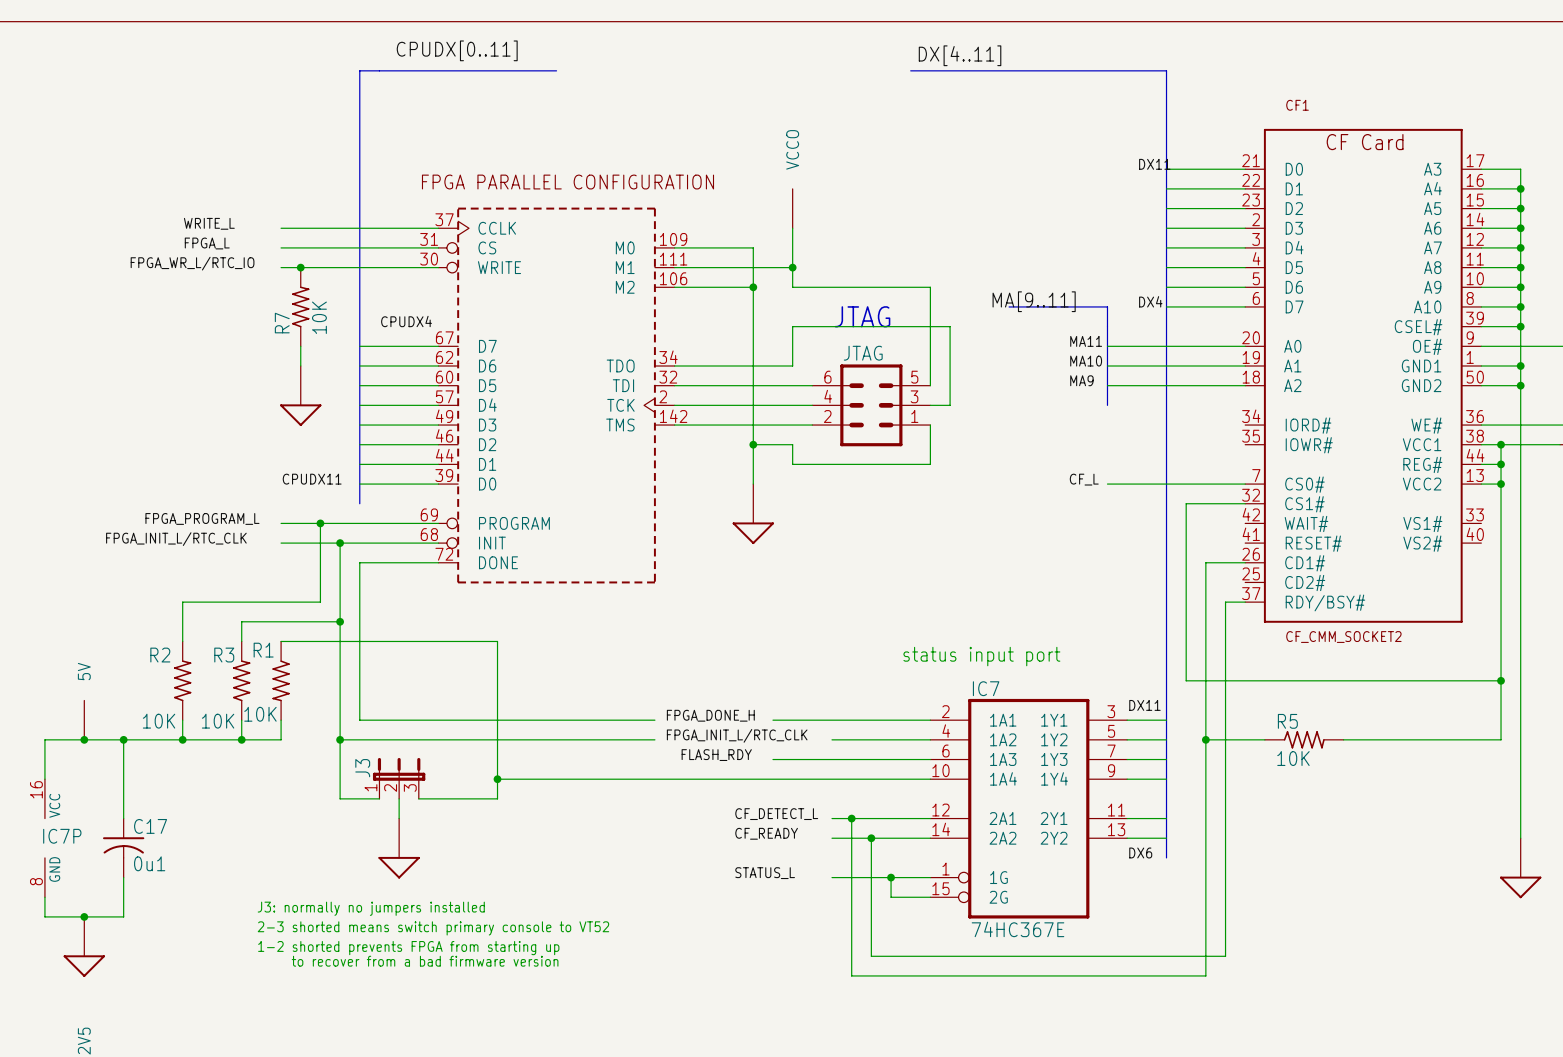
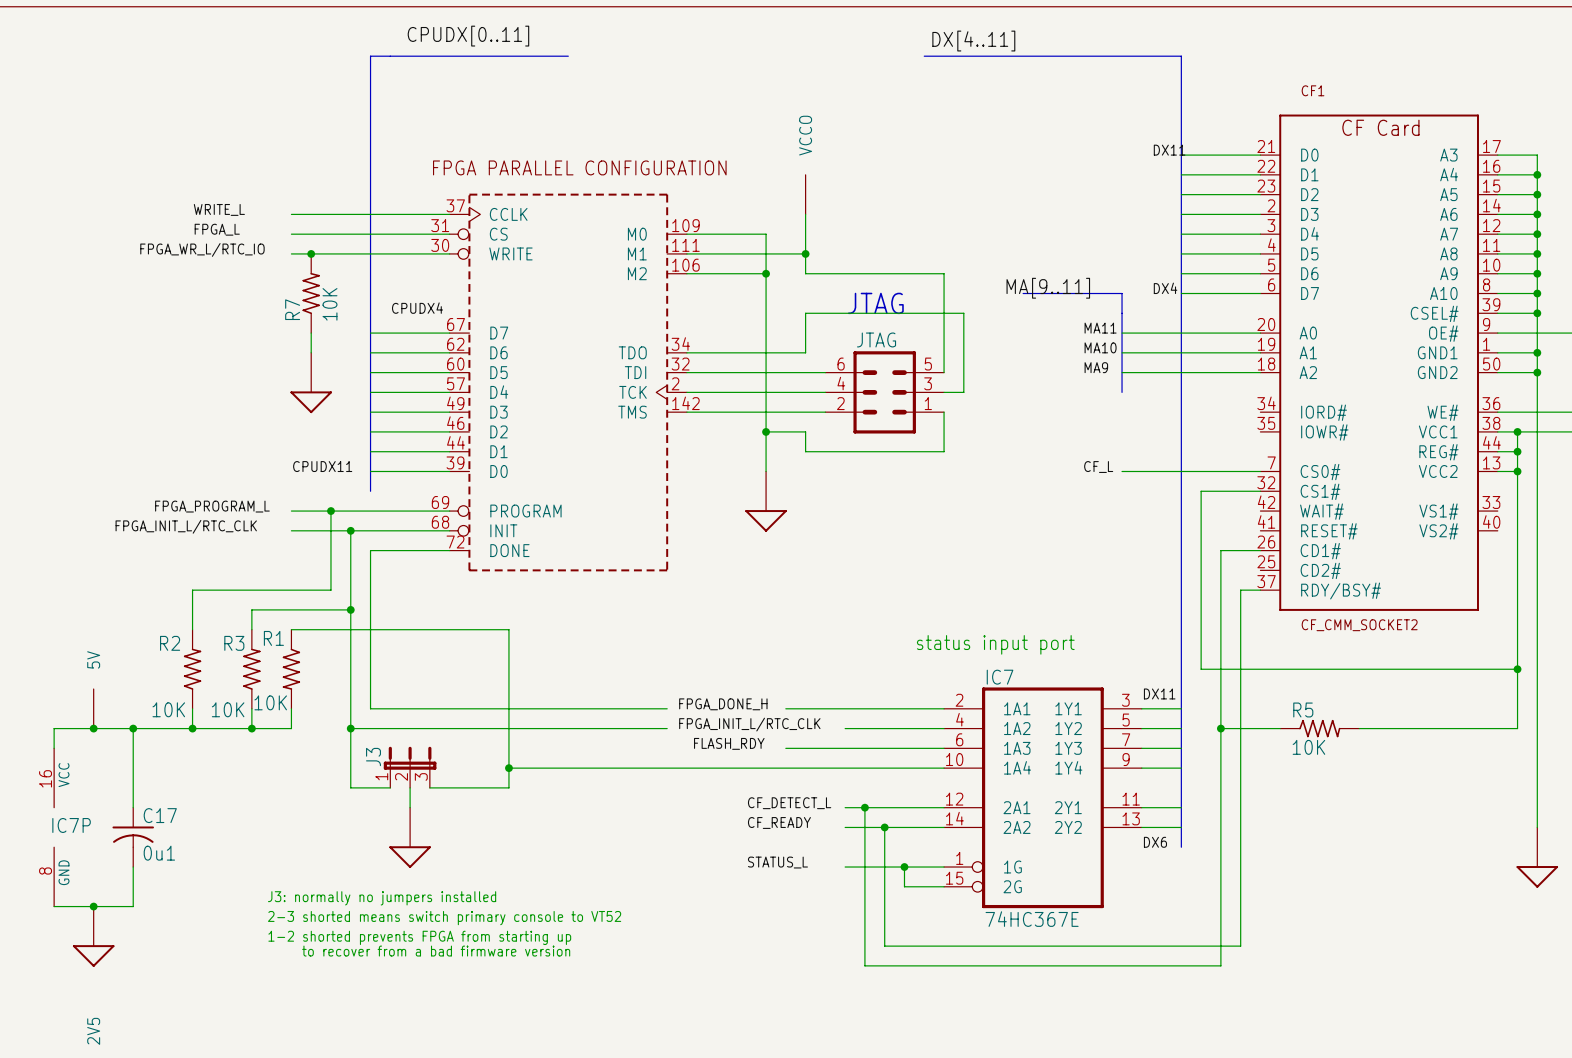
IC7P symbol: [44, 779, 45, 898] -> [54, 748, 55, 907]

